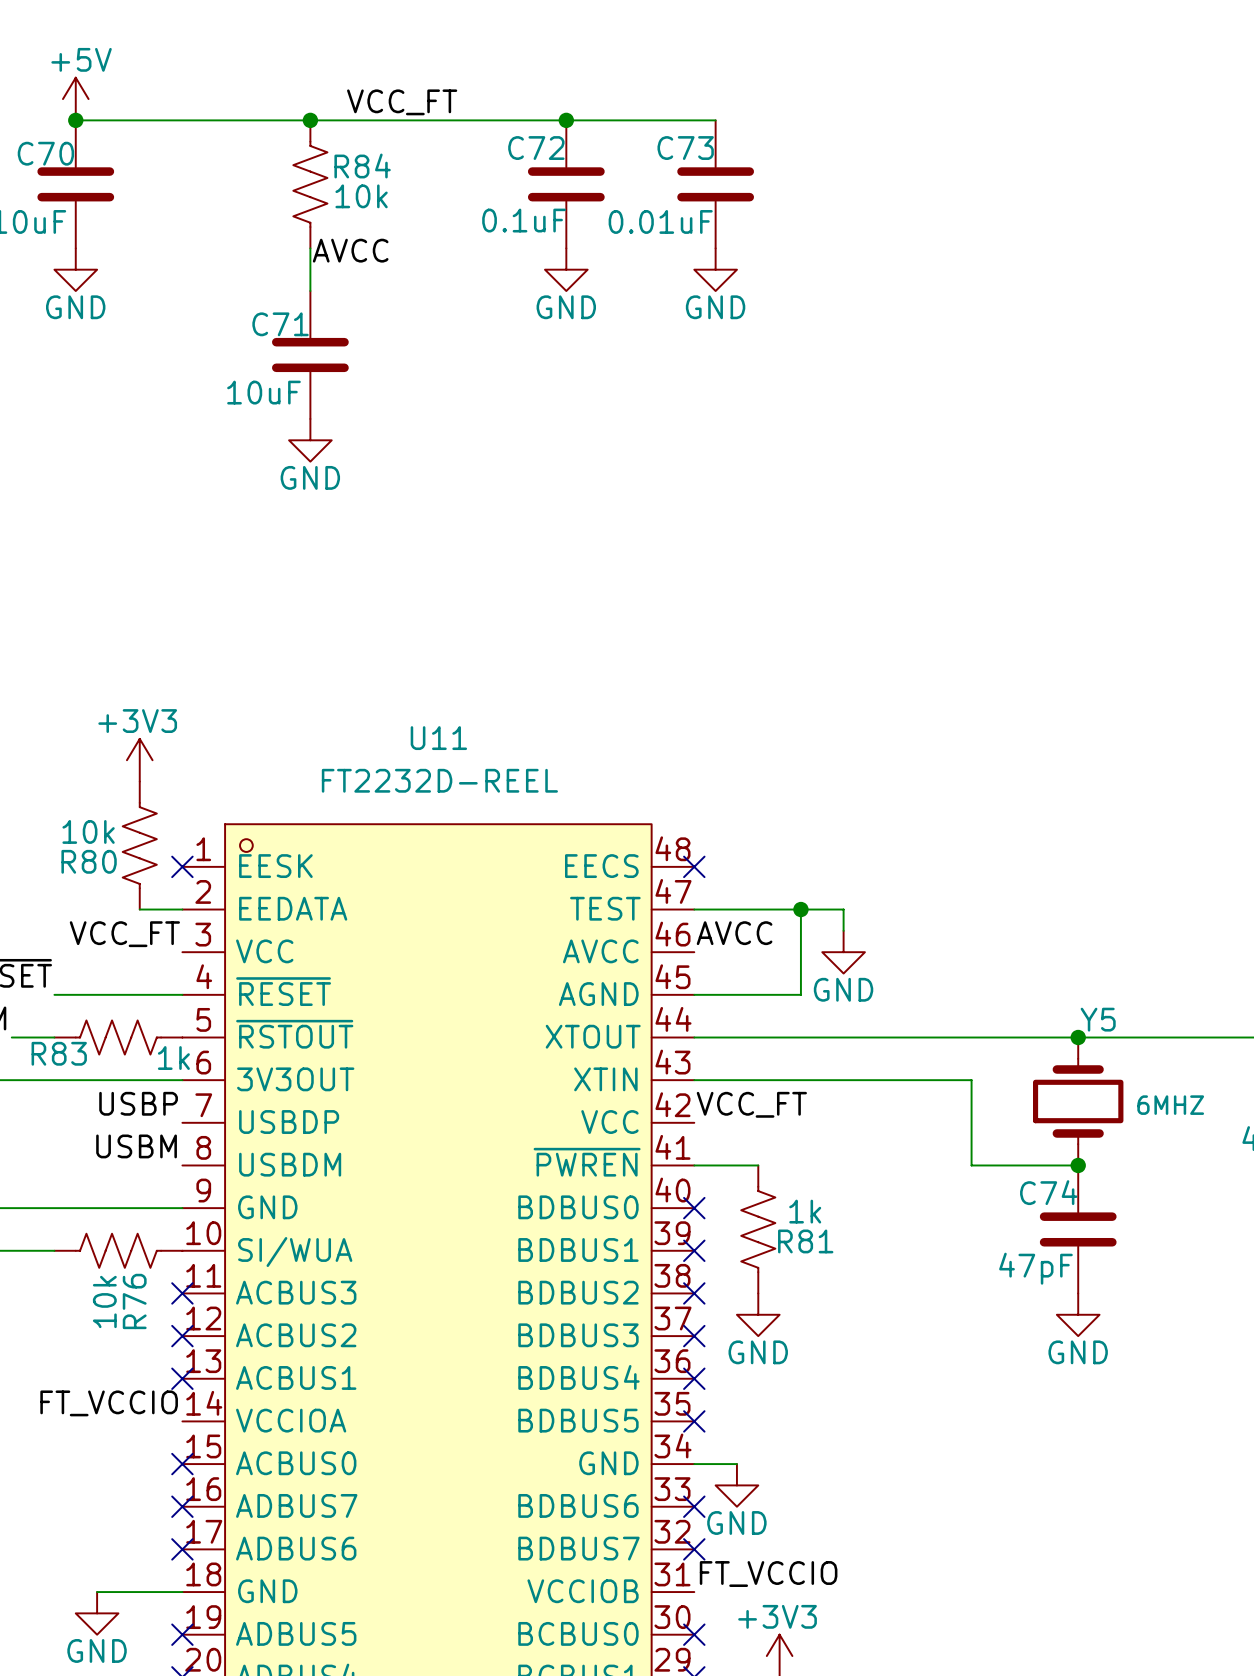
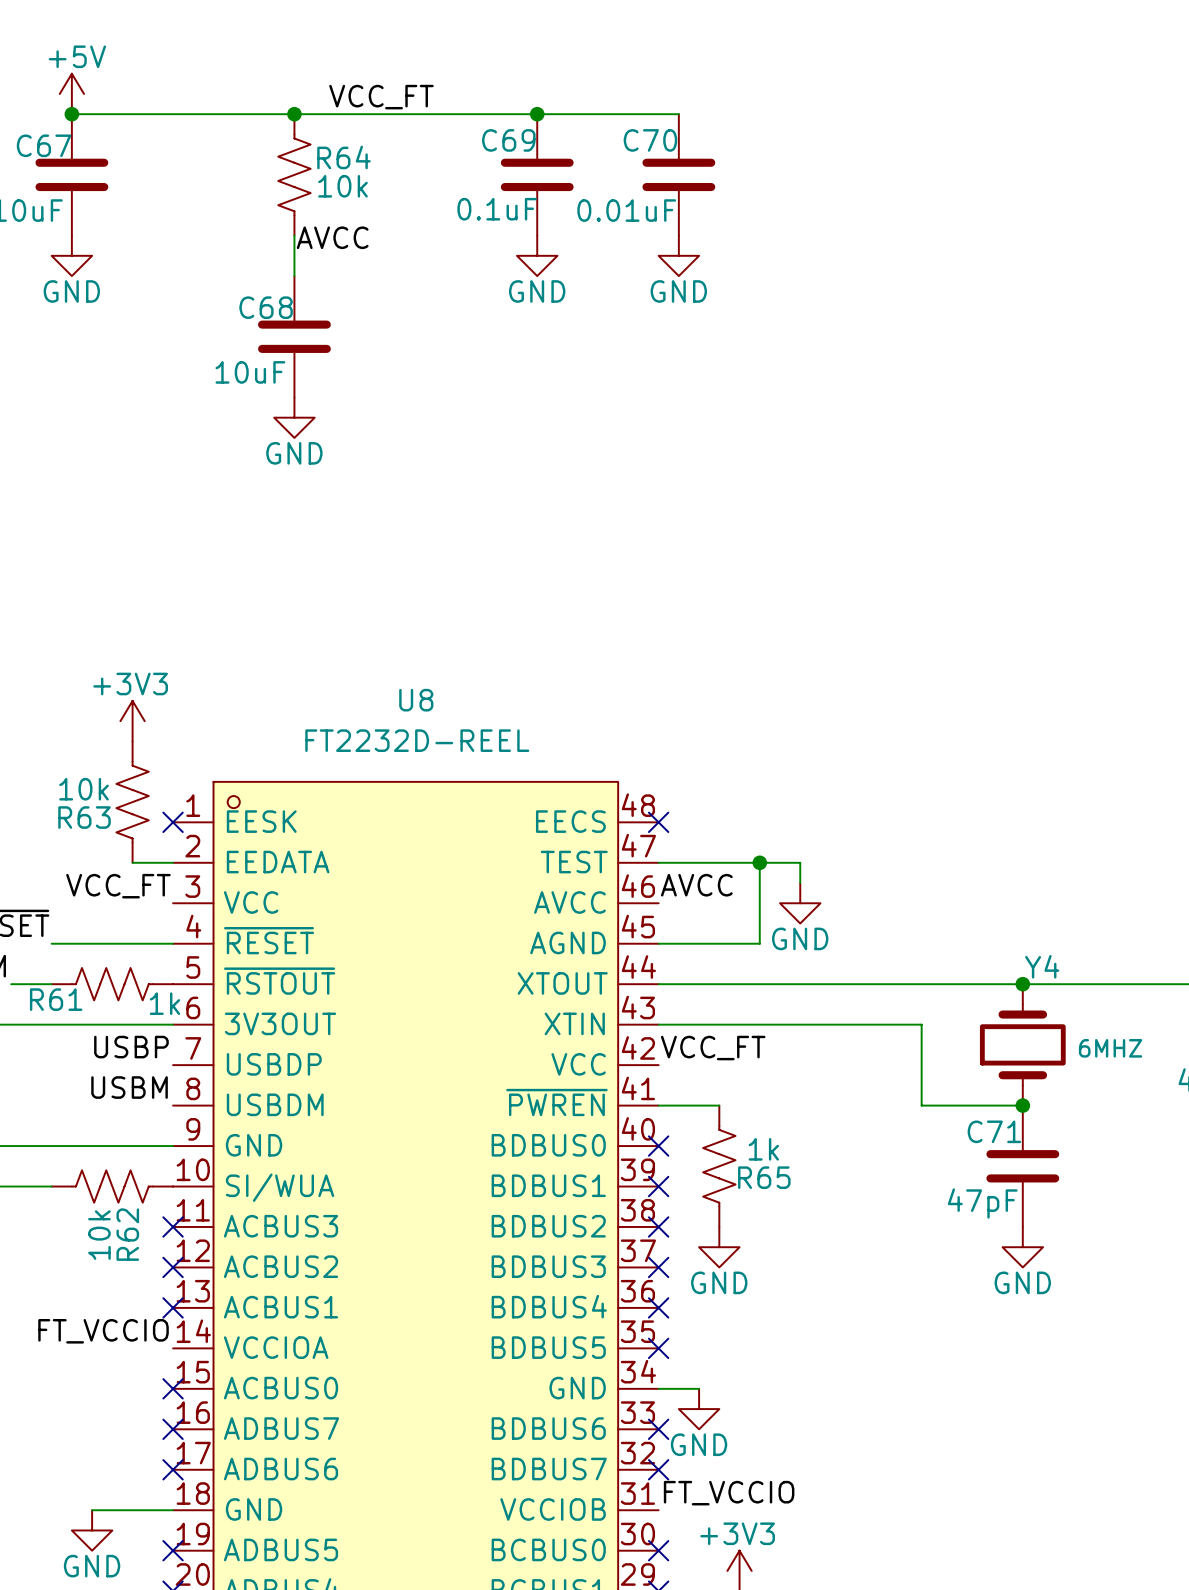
C72 name: C72 (536, 148) -> C69 (508, 140)
C73 name: C73 (685, 148) -> C70 (650, 140)
C70 name: C70 (45, 153) -> C67 (44, 145)
R84 name: R84 (362, 165) -> R64 (343, 157)
C71 name: C71 (280, 324) -> C68 (266, 307)
U11 name: U11 (438, 738) -> U8 (416, 700)
R80 name: R80 (89, 861) -> R63 (84, 817)
Y5 name: Y5 (1098, 1019) -> Y4 (1042, 966)
R83 name: R83 (59, 1053) -> R61 (56, 999)
C74 name: C74 (1048, 1192) -> C71 (994, 1131)
R81 name: R81 (805, 1241) -> R65 (764, 1177)
R76 name: R76 (134, 1301) -> R62 (127, 1234)

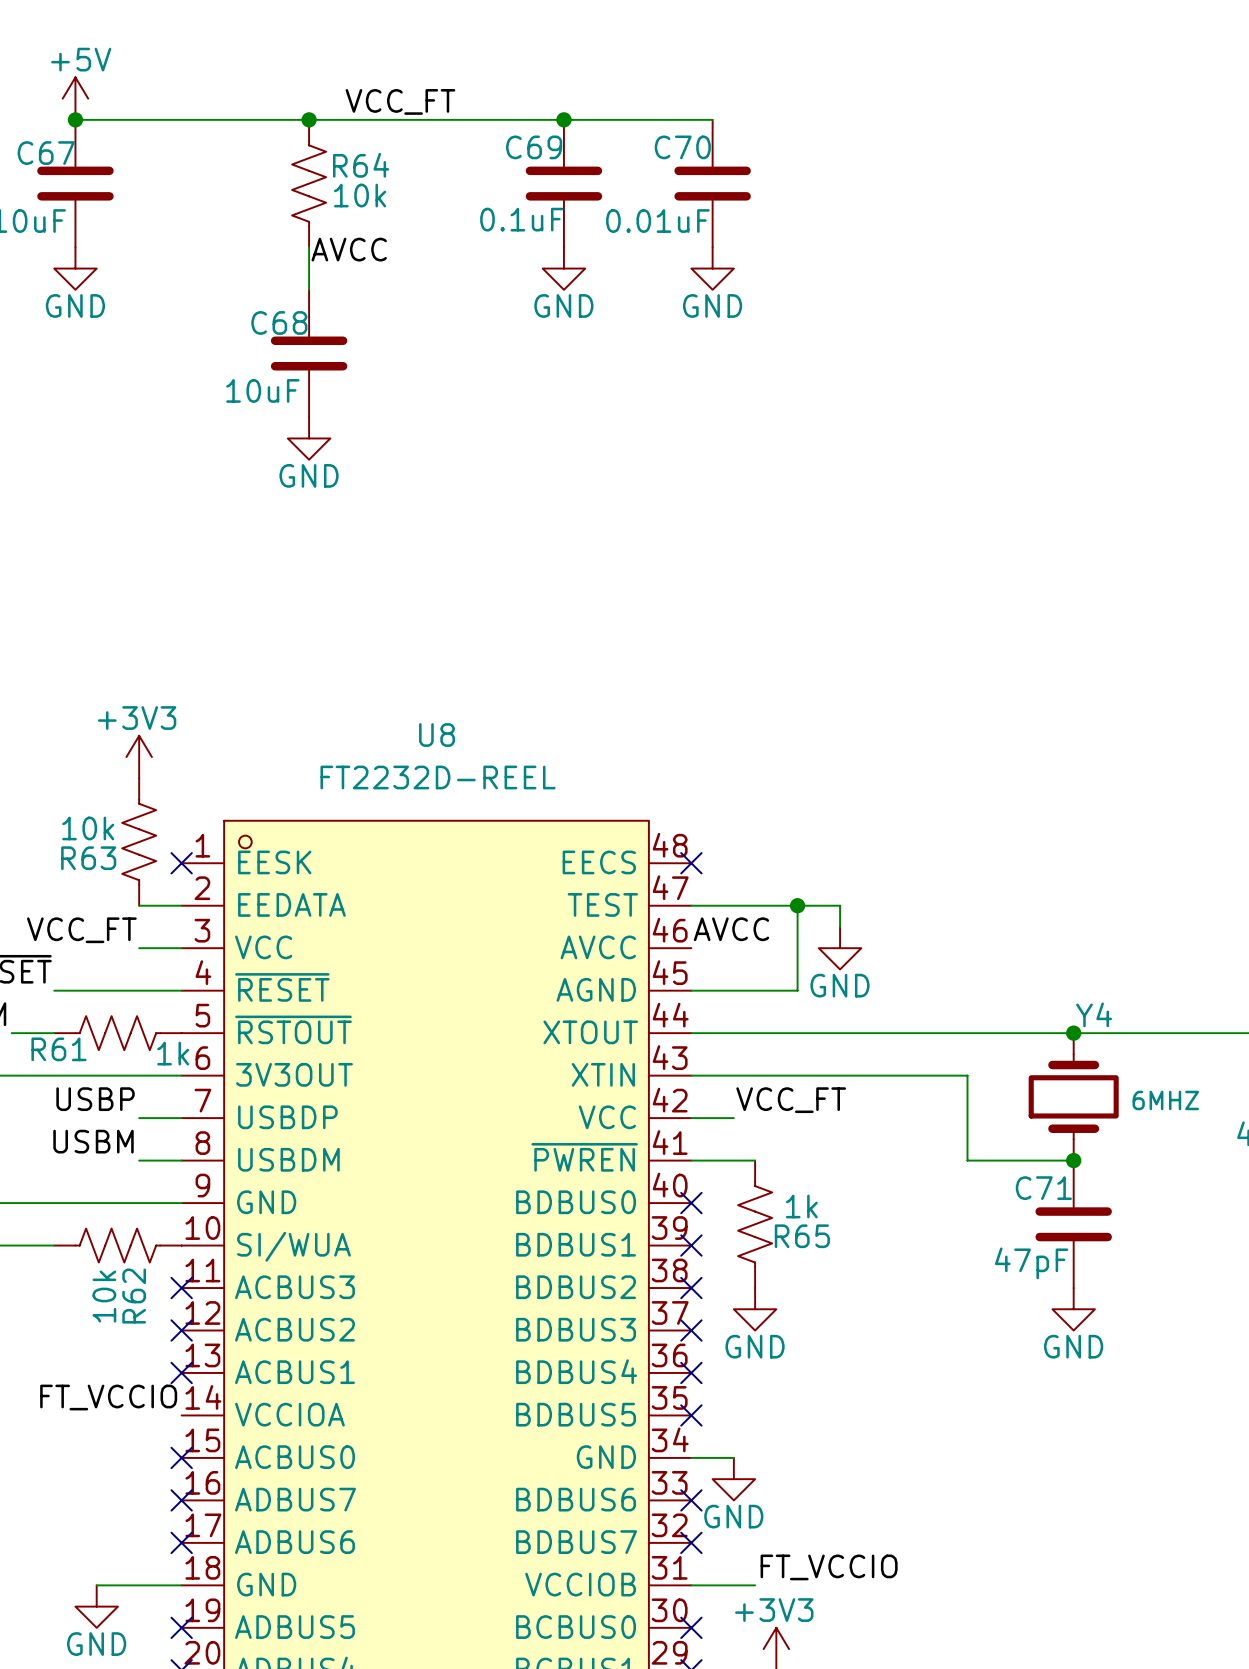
label position: VCC_FT (118, 886) -> VCC_FT (81, 930)
wire: none -> (139, 948) (181, 948)
label position: USBP (131, 1047) -> USBP (95, 1099)
label position: VCC_FT (713, 1048) -> VCC_FT (791, 1100)
wire: none -> (139, 1118) (181, 1118)
wire: none -> (691, 1118) (733, 1118)
label position: USBM (129, 1087) -> USBM (93, 1141)
wire: none -> (139, 1160) (181, 1160)
label position: FT_VCCIO (729, 1493) -> FT_VCCIO (829, 1567)
wire: none -> (691, 1585) (755, 1585)

